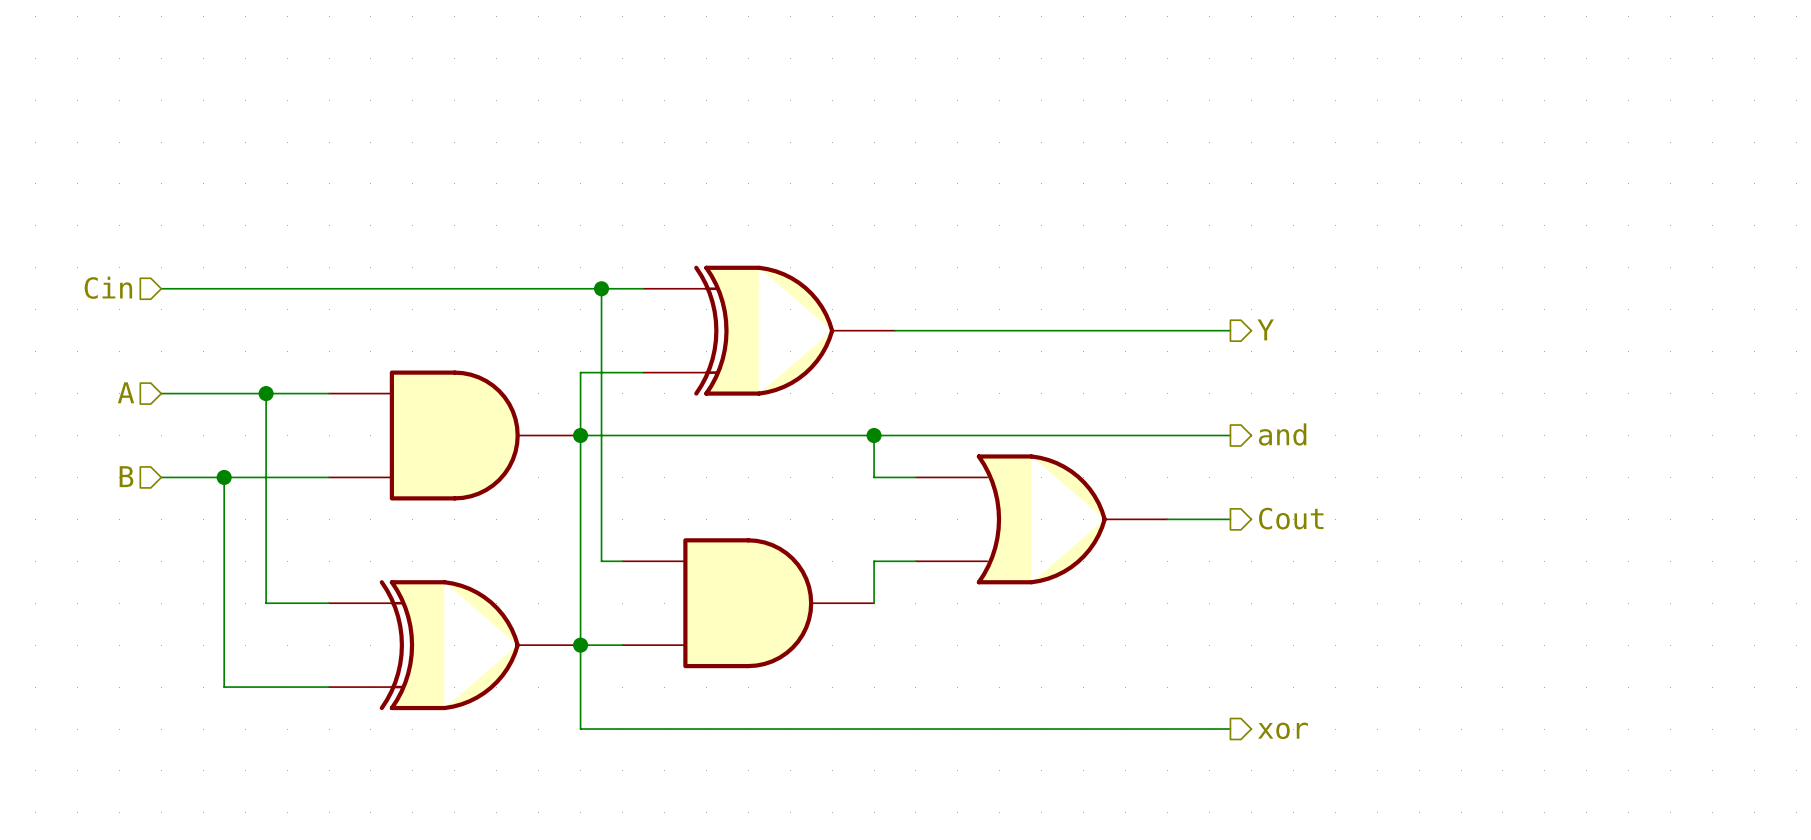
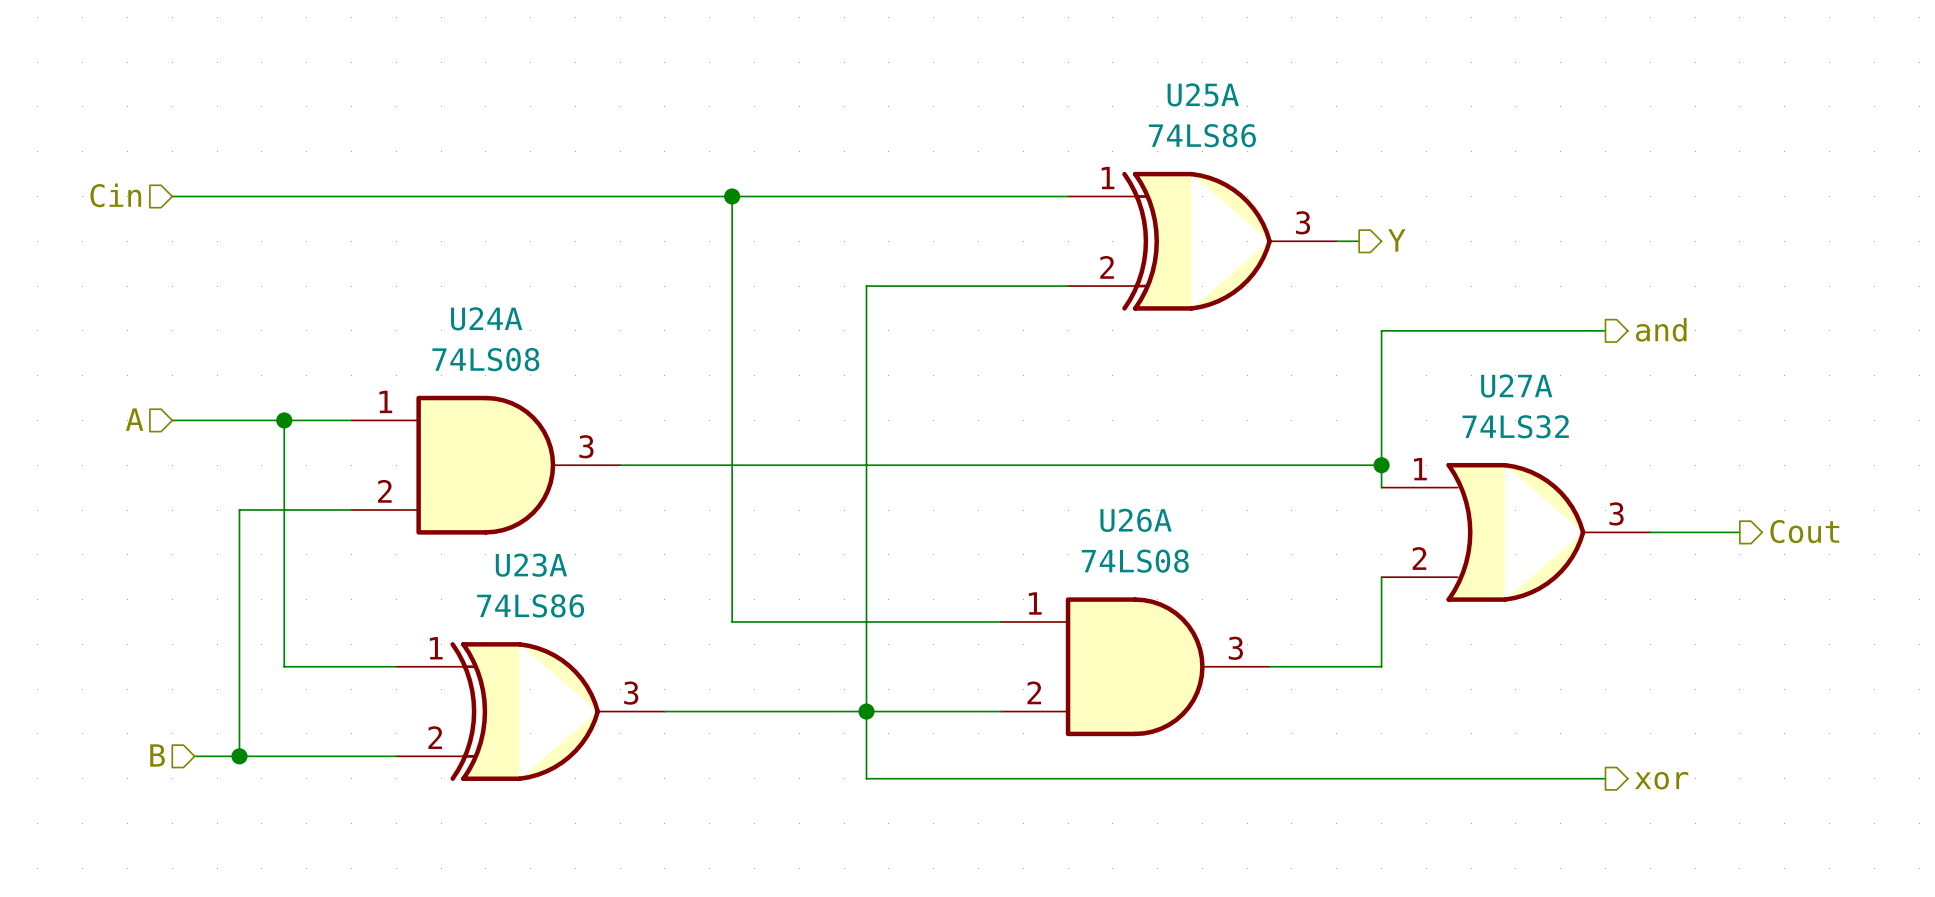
wire: none -> (172, 196) (1068, 196)
wire: none -> (732, 196) (732, 621) (1000, 621)
junction: none -> (732, 196)
U25A: none -> 74LS86 (1202, 241)
wire: none -> (1336, 241) (1359, 241)
hierarchical label position: Cin (108, 287) -> Cin (115, 195)
wire: (161, 288) (643, 288) -> none
wire: (601, 288) (601, 561) (622, 561) -> none
junction: (601, 288) -> none
U24A name: none -> U24A (486, 318)
wire: none -> (1605, 330) (1381, 330) (1381, 487)
hierarchical label position: Y (1265, 329) -> Y (1396, 240)
part: (769, 330) -> none
wire: (895, 330) (1230, 330) -> none
U24A value: none -> 74LS08 (485, 359)
wire: (643, 372) (580, 372) (580, 729) (811, 729) -> (1068, 286) (866, 286) (866, 778)
U24A pin number: none -> 1 (385, 401)
U24A pin number: none -> 3 (586, 446)
hierarchical label position: and (1282, 434) -> and (1661, 329)
junction: (580, 435) -> none
wire: (874, 435) (874, 477) (915, 477) -> none
junction: (874, 435) -> none
junction: none -> (1381, 465)
U24A pin number: none -> 2 (384, 491)
hierarchical label position: B (126, 476) -> B (157, 755)
wire: (161, 477) (224, 477) -> none
junction: (224, 477) -> none
U27A: none -> 74LS32 (1515, 532)
wire: none -> (1650, 532) (1739, 532)
hierarchical label position: Cout (1291, 518) -> Cout (1804, 531)
part: (1041, 519) -> none
wire: (1167, 519) (1230, 519) -> (1314, 465) (1381, 465)
wire: none -> (1381, 577) (1381, 666) (1269, 666)
wire: (915, 561) (874, 561) (874, 603) -> none
wire: (266, 603) (329, 603) -> (284, 644) (284, 666) (396, 666)
part: (748, 603) -> none
U26A: none -> 74LS08 (1135, 666)
part: (454, 645) -> none
wire: (580, 645) (622, 645) -> none
junction: (580, 645) -> none
U23A: none -> 74LS86 (530, 711)
wire: none -> (664, 711) (1000, 711)
junction: none -> (866, 711)
wire: (224, 687) (329, 687) -> (239, 733) (239, 756)
wire: none -> (194, 756) (396, 756)
junction: none -> (239, 756)
wire: none -> (1314, 778) (1605, 778)
hierarchical label position: xor (1283, 730) -> xor (1661, 780)

